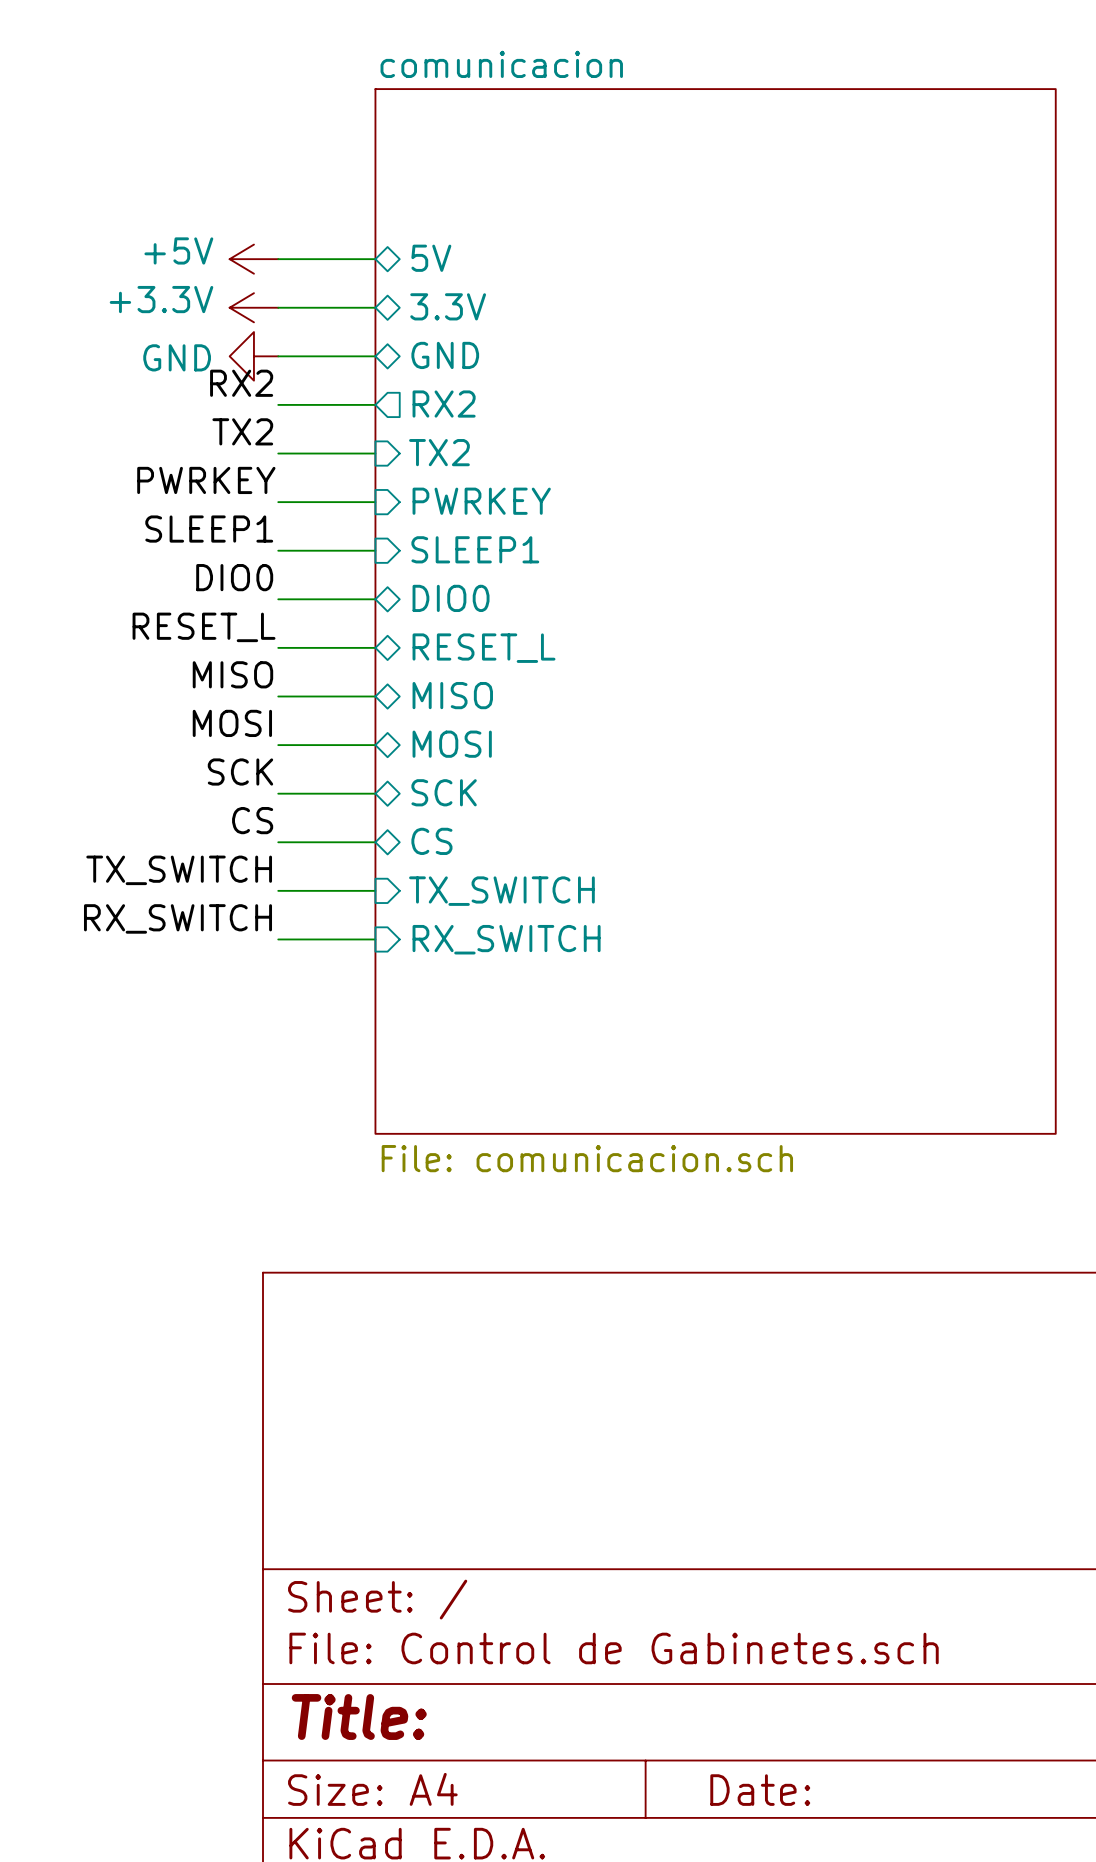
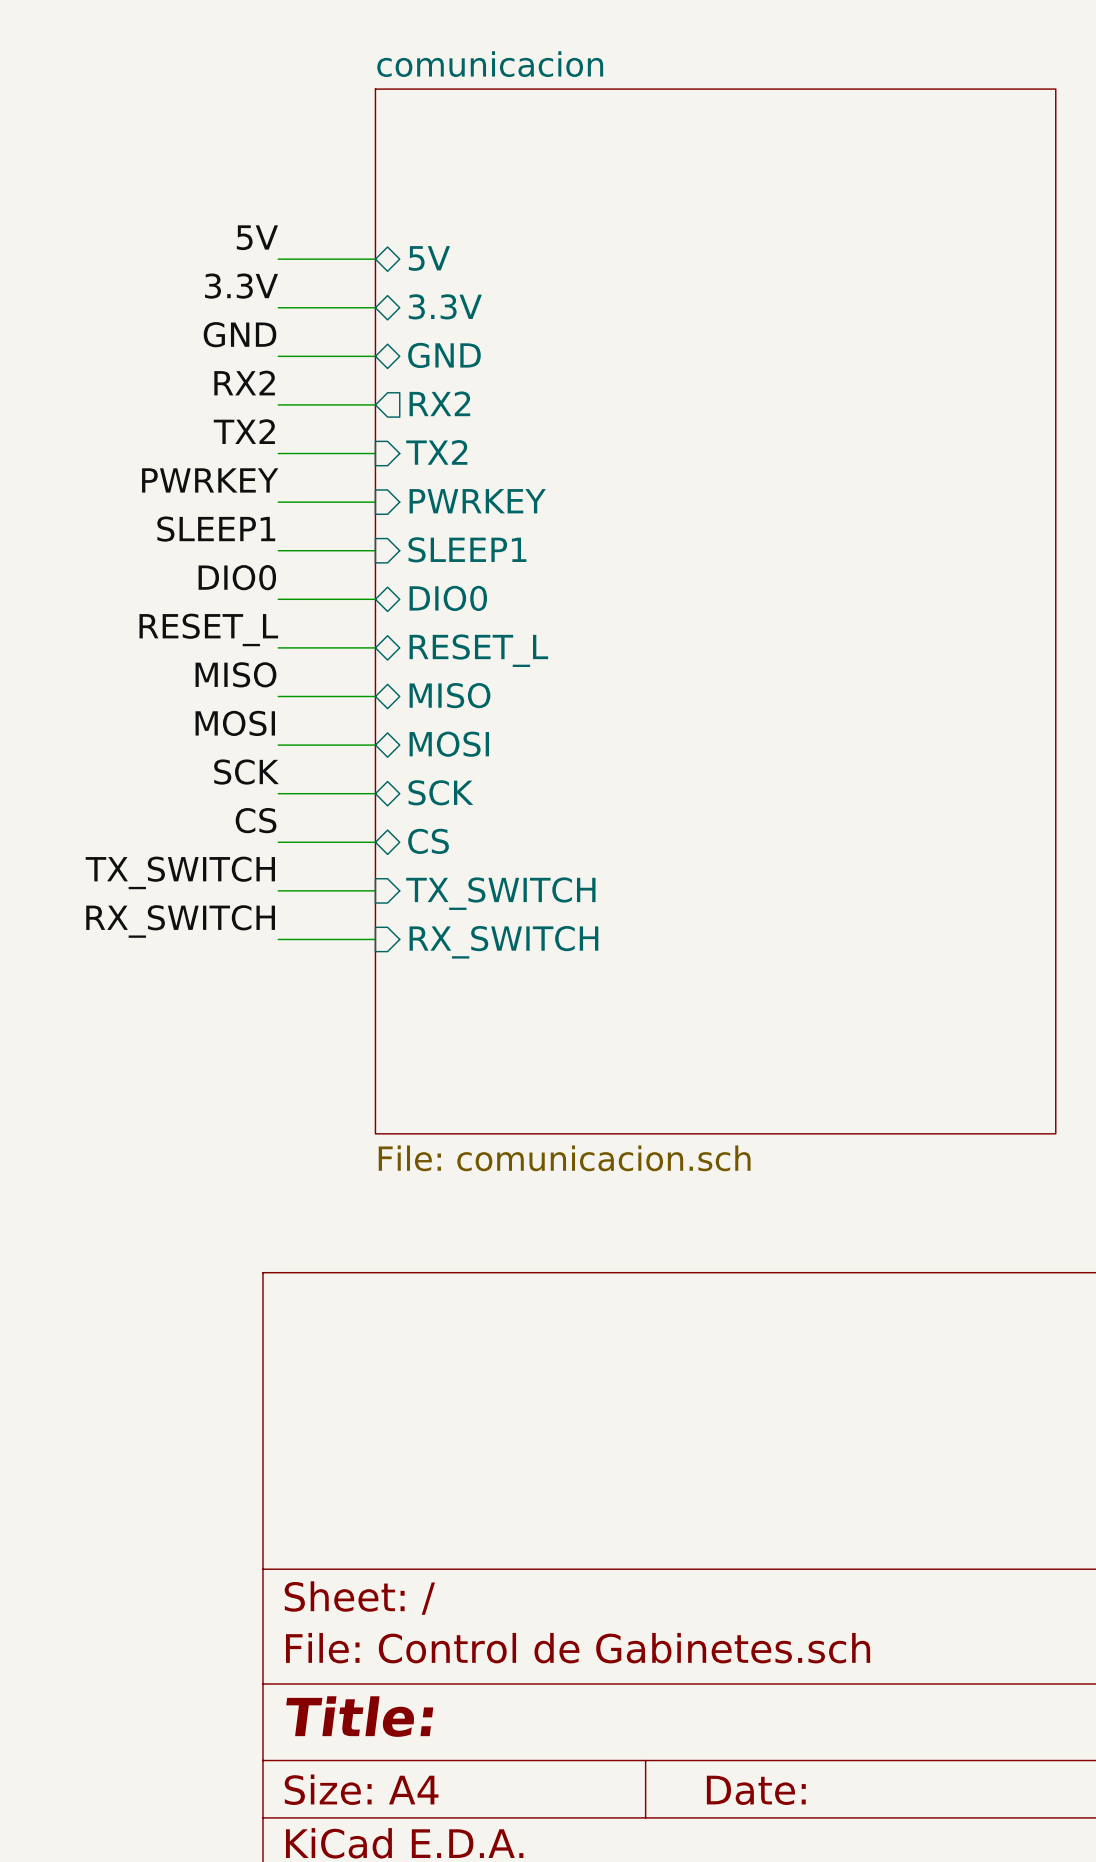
label: none -> 5V (257, 237)
power symbol: +5V (253, 259) -> none
label: none -> 3.3V (241, 286)
power symbol: +3.3V (253, 307) -> none
label: none -> GND (240, 334)
power symbol: GND (253, 356) -> none

